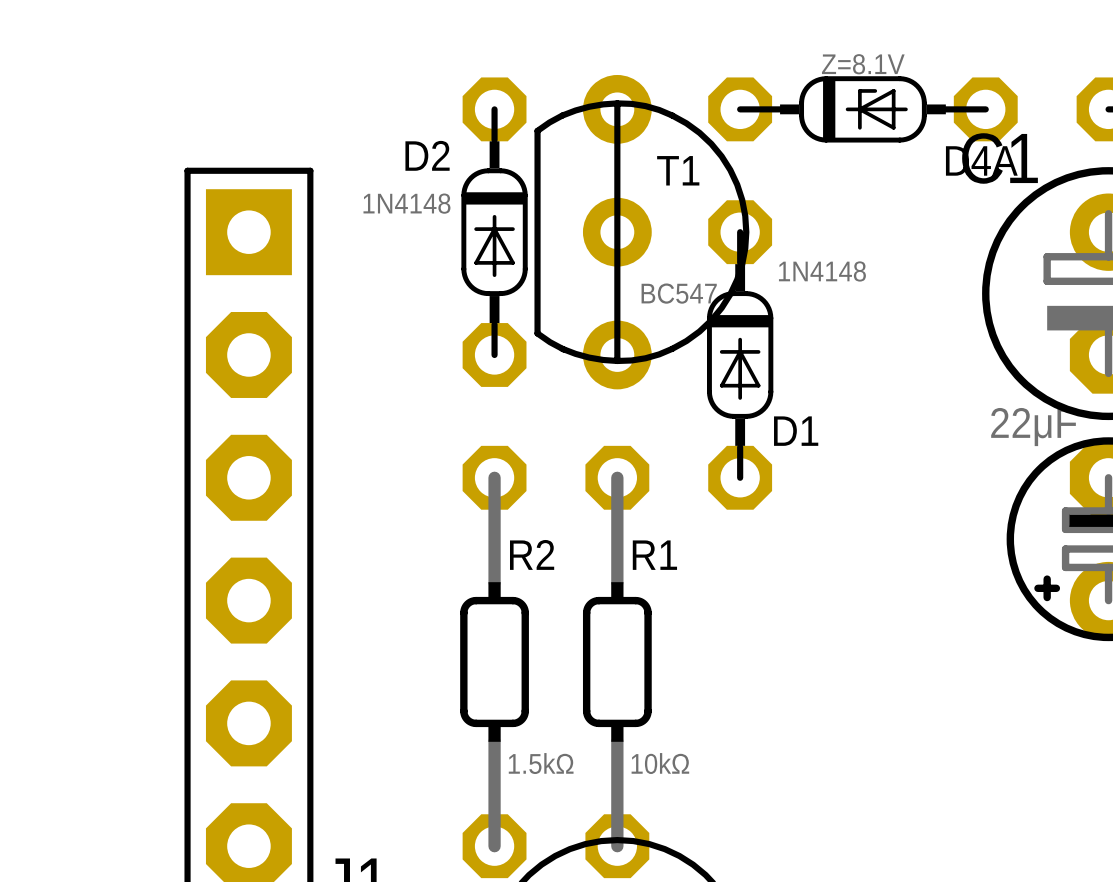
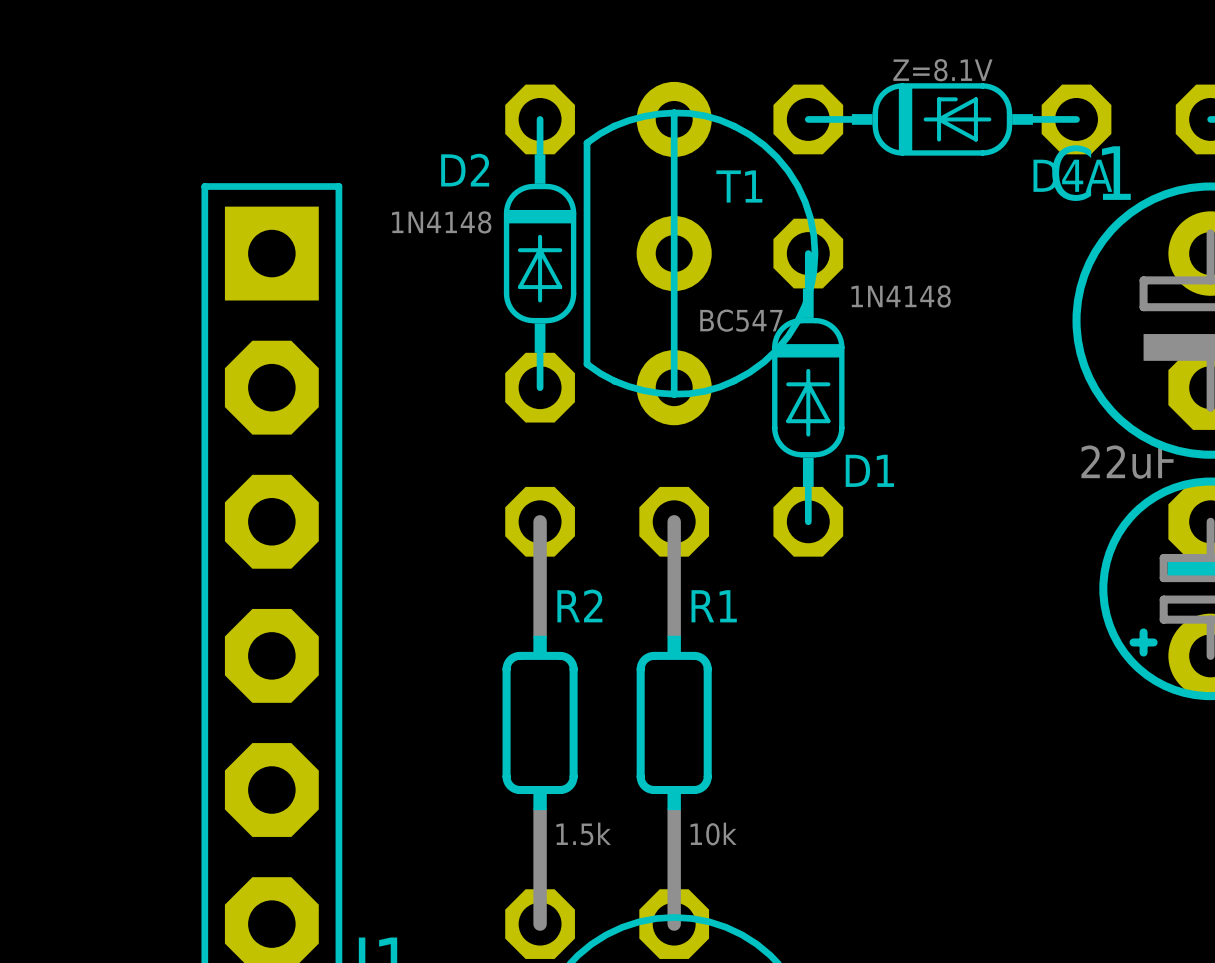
part value: 22μF (1033, 427) -> 22uF (1128, 462)
R2 value: 1.5kΩ (541, 763) -> 1.5k (583, 834)
R1 value: 10kΩ (660, 763) -> 10k (713, 834)

